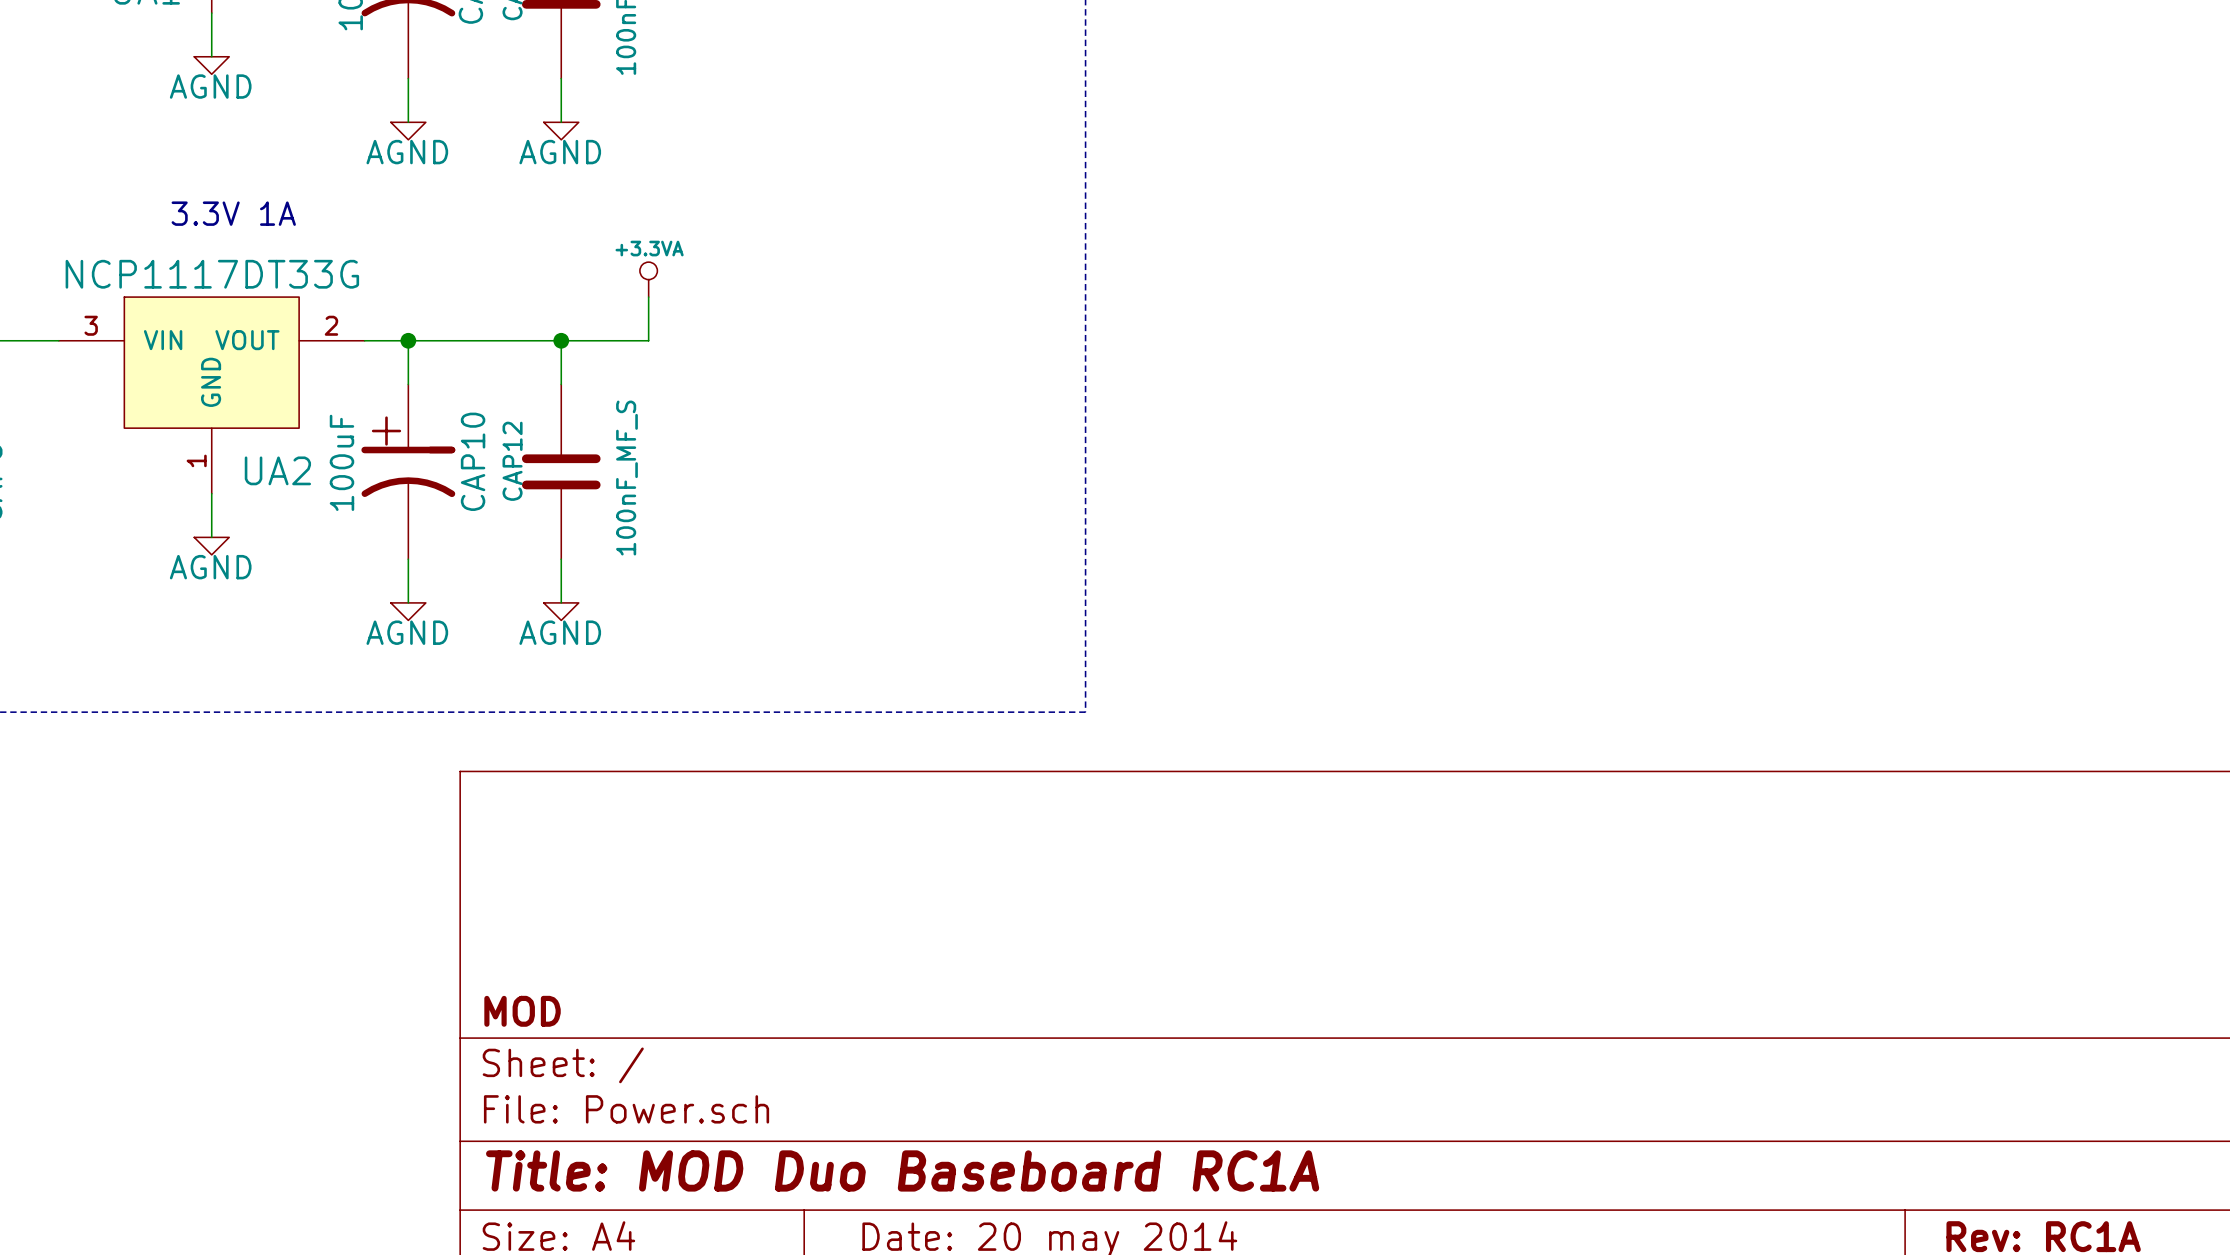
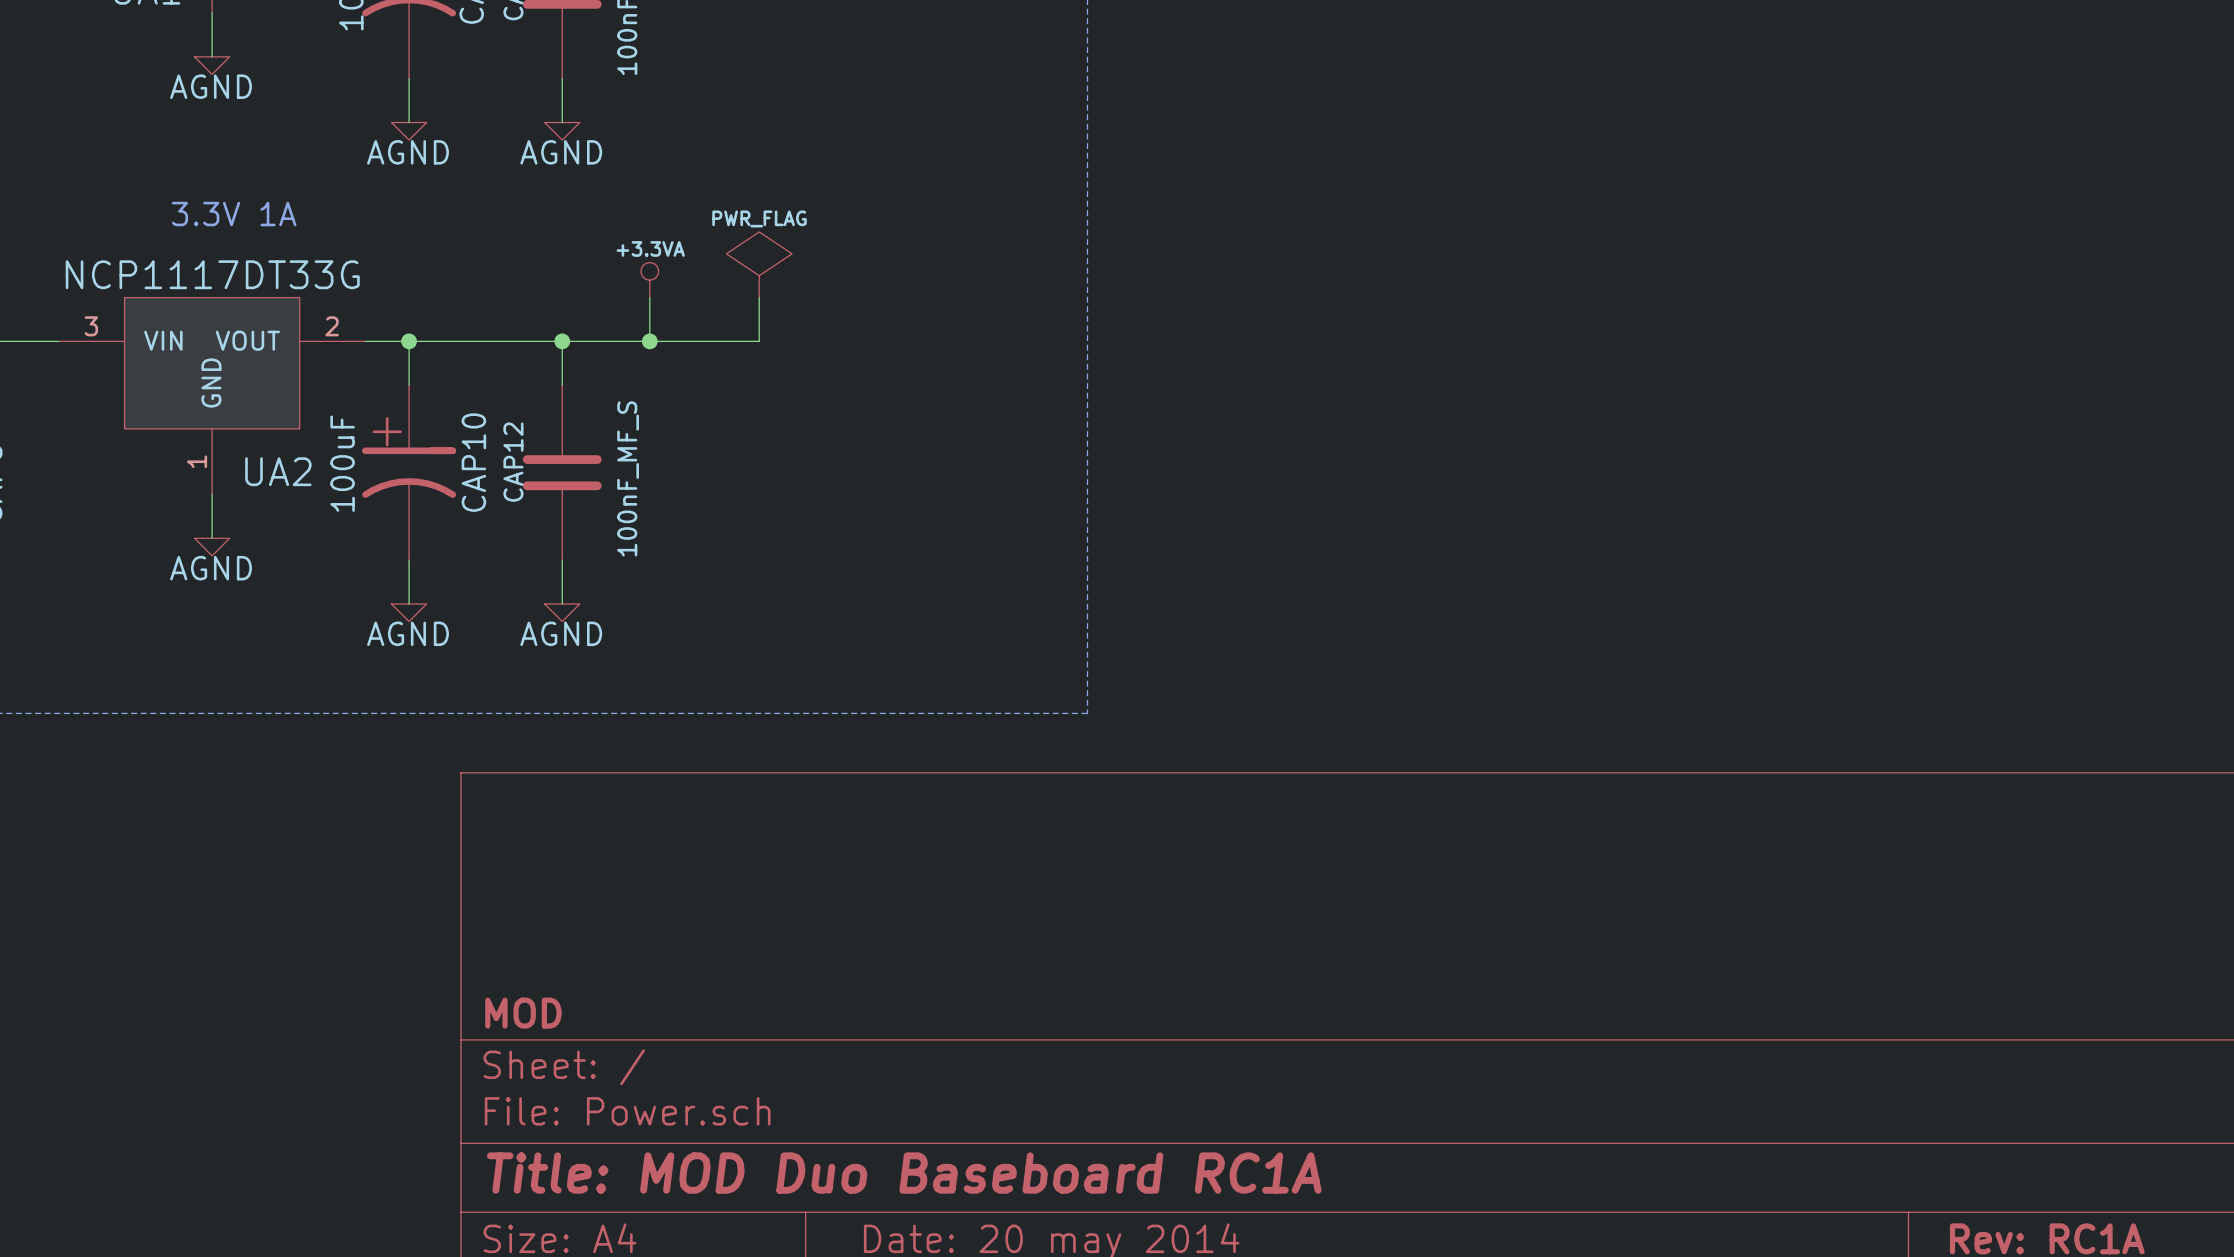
power symbol: none -> PWR_FLAG (759, 264)
wire: none -> (759, 297) (759, 341) (649, 341)
junction: none -> (649, 341)

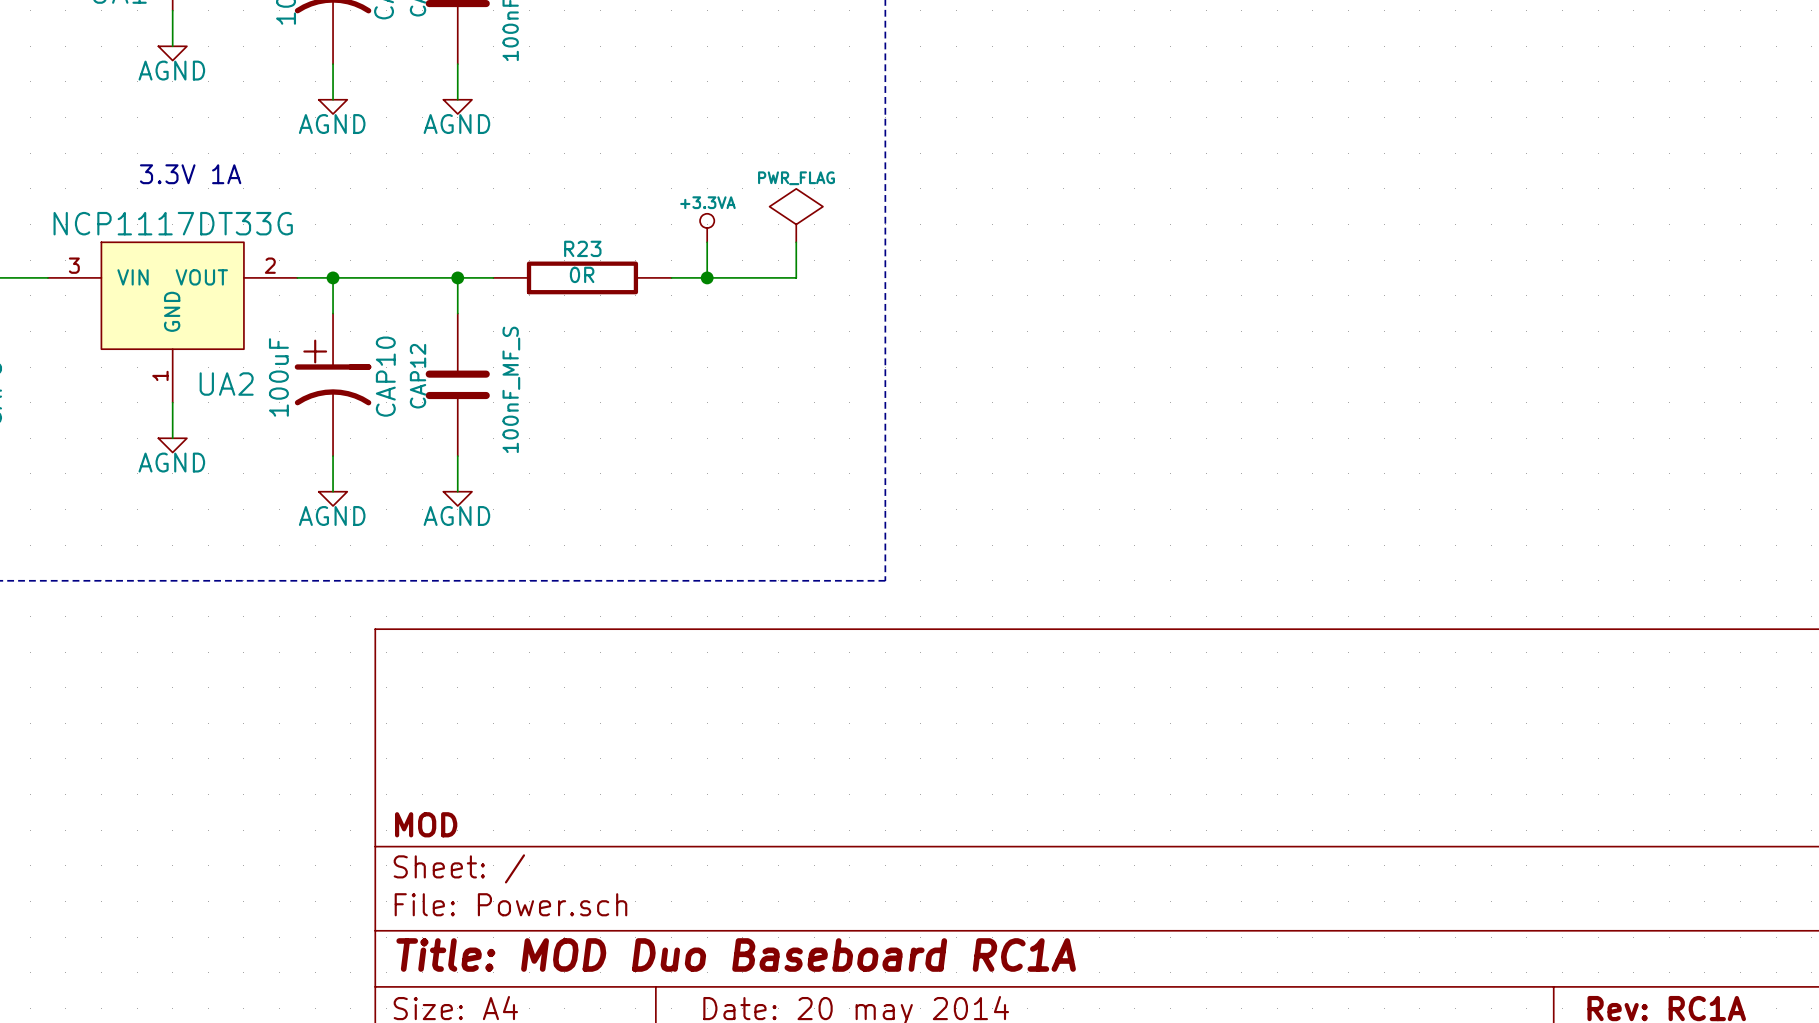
power symbol position: PWR_FLAG (759, 264) -> PWR_FLAG (796, 215)
power symbol position: +3.3VA (649, 280) -> +3.3VA (707, 228)
wire: (649, 297) (649, 341) -> (707, 242) (707, 277)
wire: (759, 297) (759, 341) (606, 341) -> (796, 242) (796, 277) (671, 277)
junction: (649, 341) -> none
R23: none -> 0R (582, 277)
junction: none -> (707, 277)

